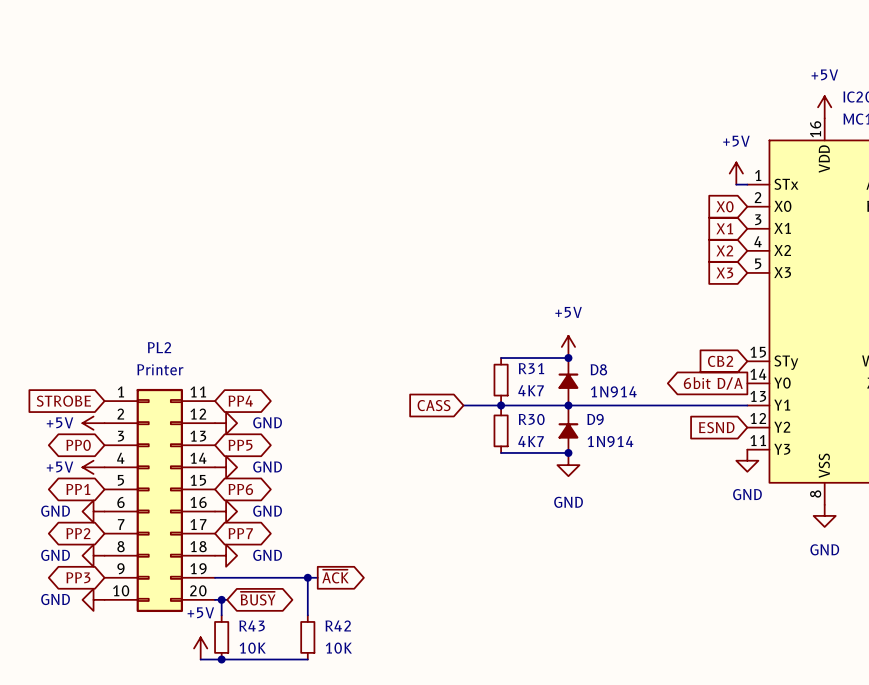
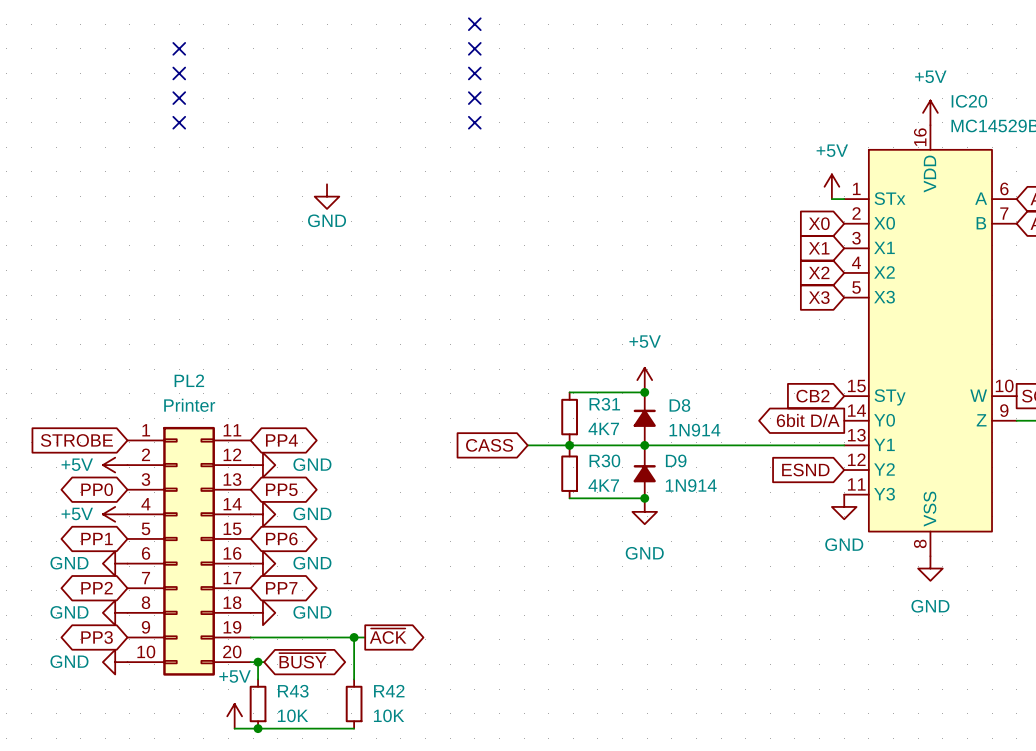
no-connect mark: none -> (474, 24)
no-connect mark: none -> (179, 48)
no-connect mark: none -> (474, 48)
no-connect mark: none -> (179, 73)
no-connect mark: none -> (474, 73)
no-connect mark: none -> (179, 98)
no-connect mark: none -> (474, 98)
no-connect mark: none -> (179, 122)
no-connect mark: none -> (474, 122)
power symbol: none -> GND (327, 196)

